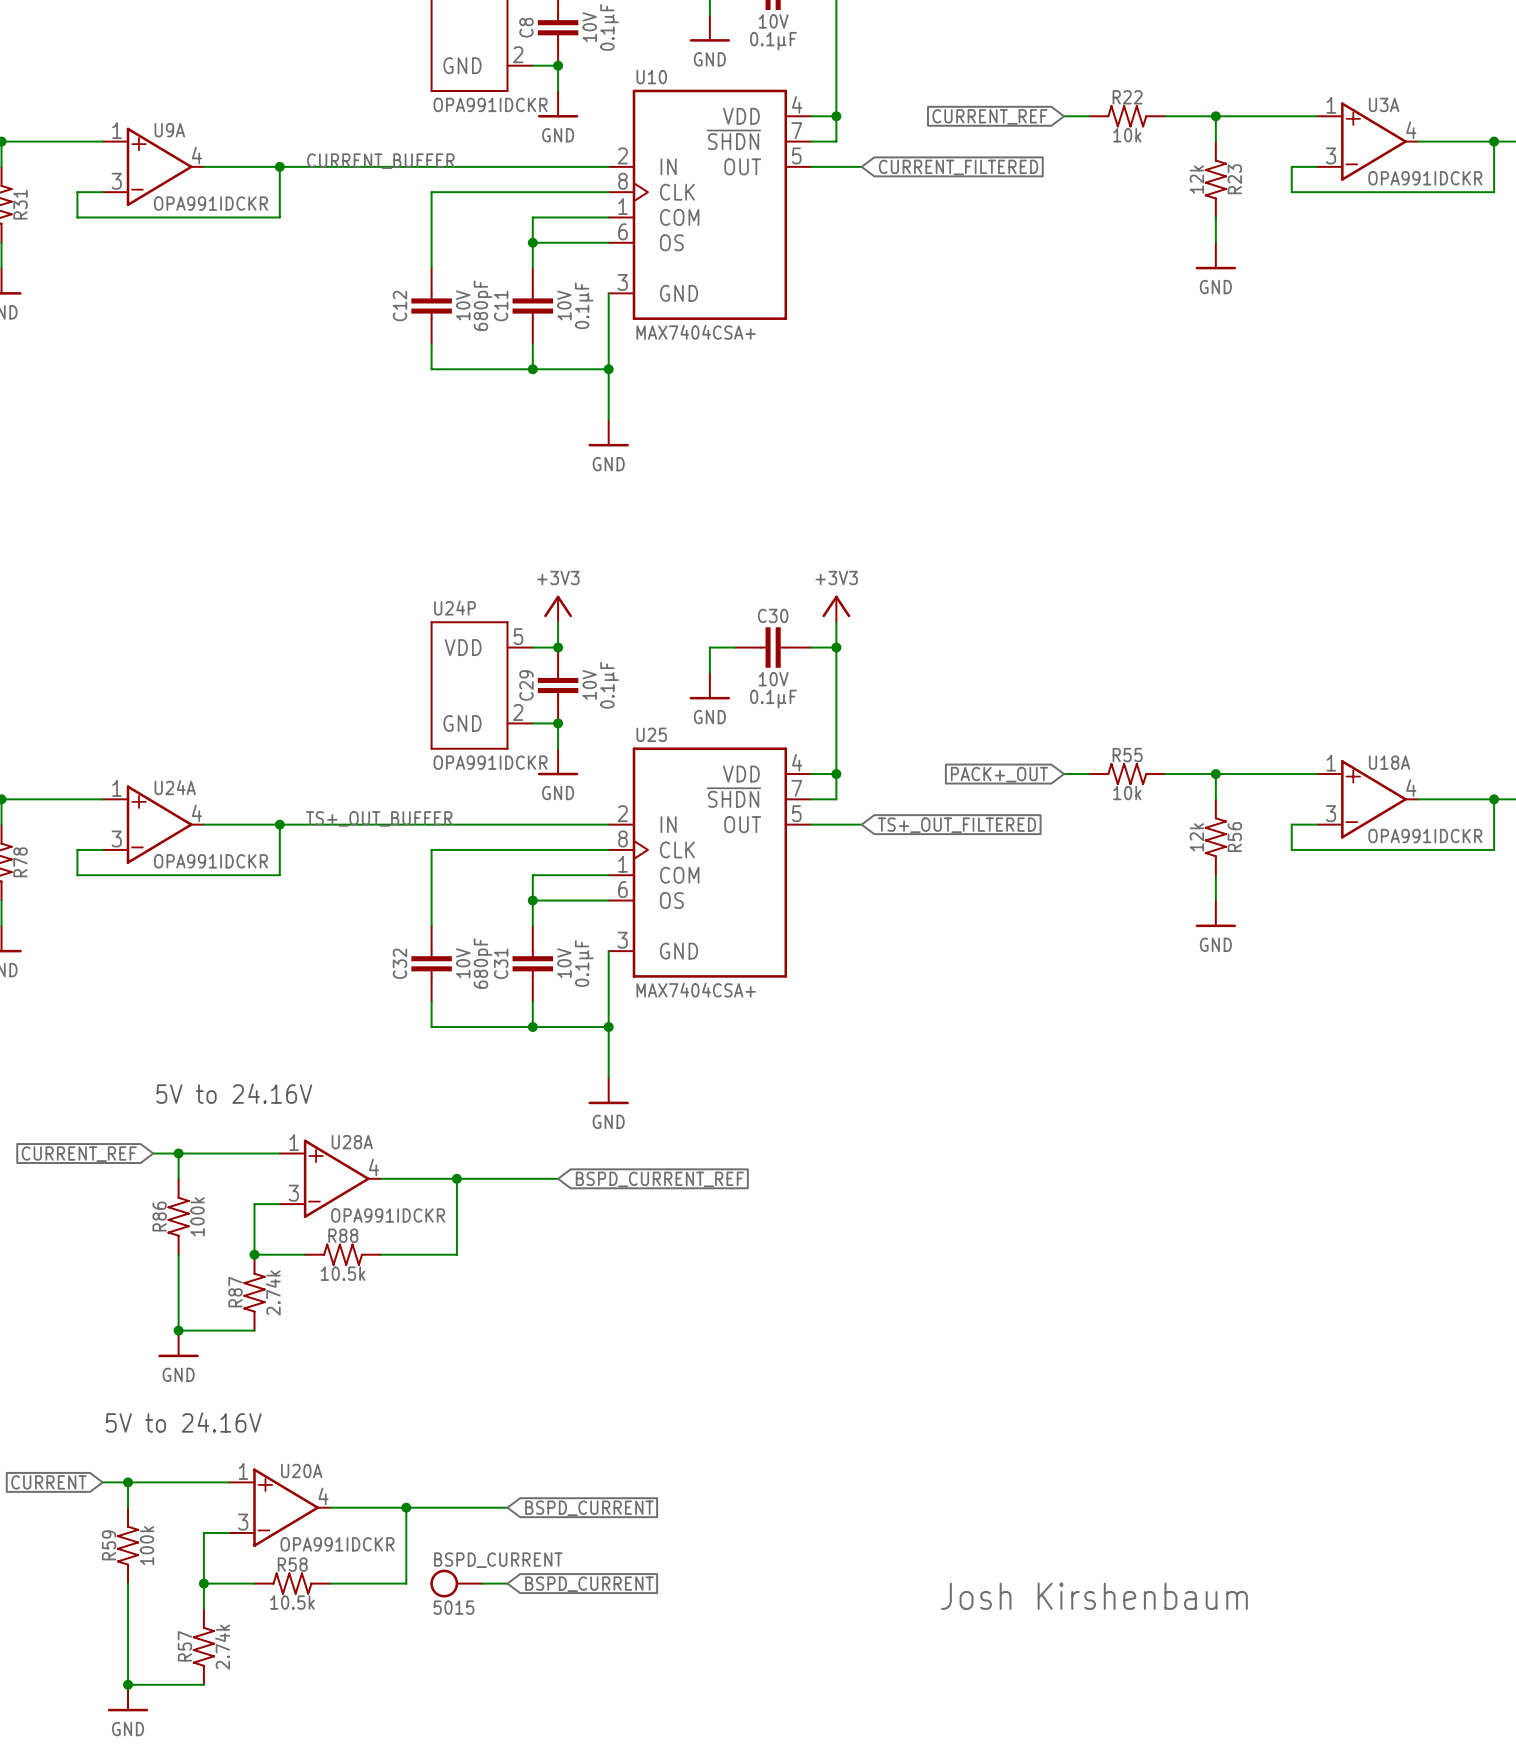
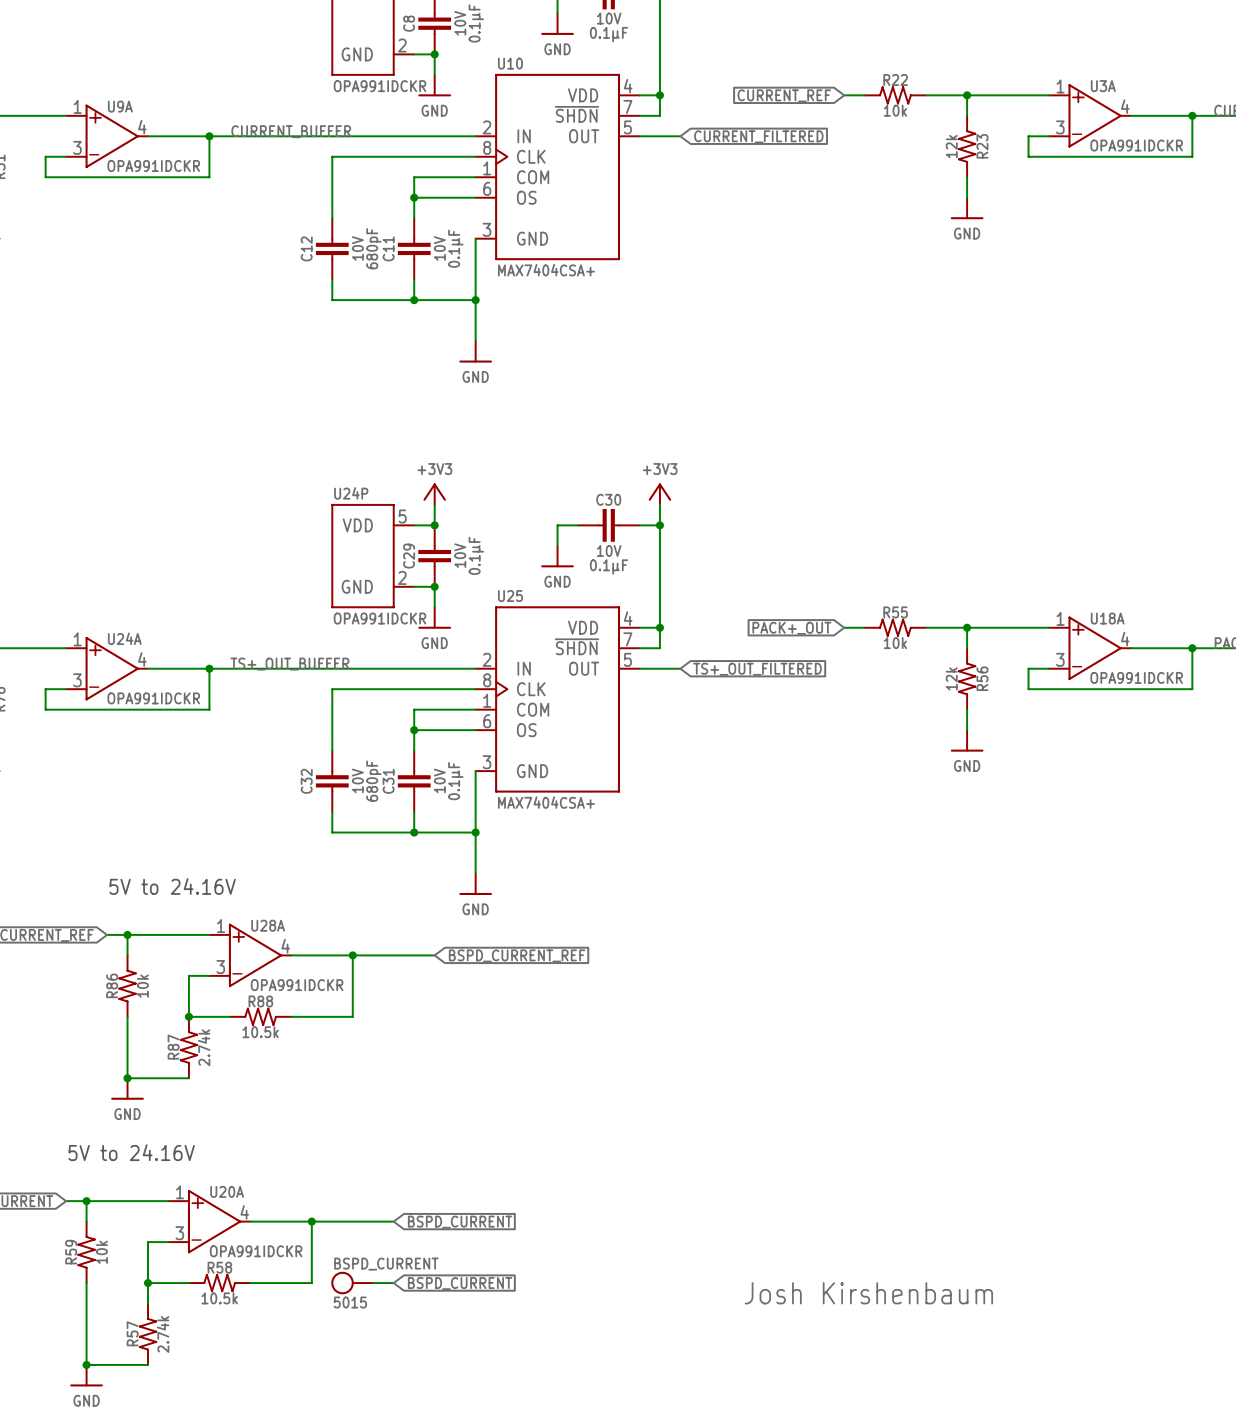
R86 text: 100k (197, 1216) -> 10k (142, 986)
R59 text: 100k (146, 1545) -> 10k (101, 1252)

